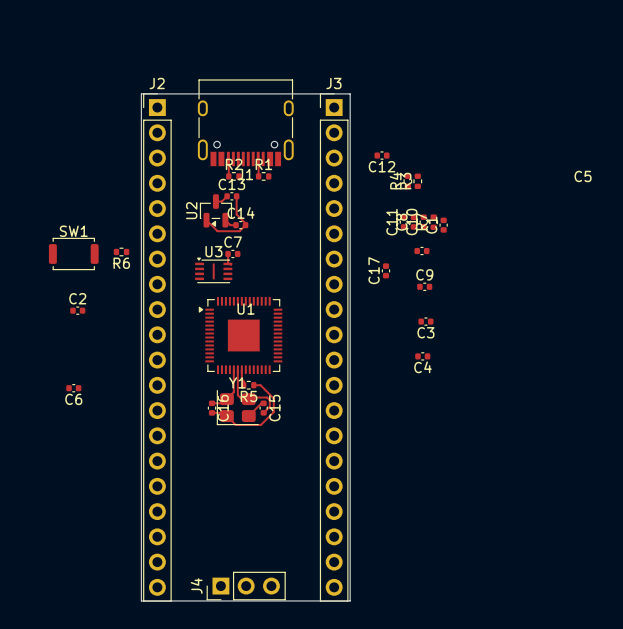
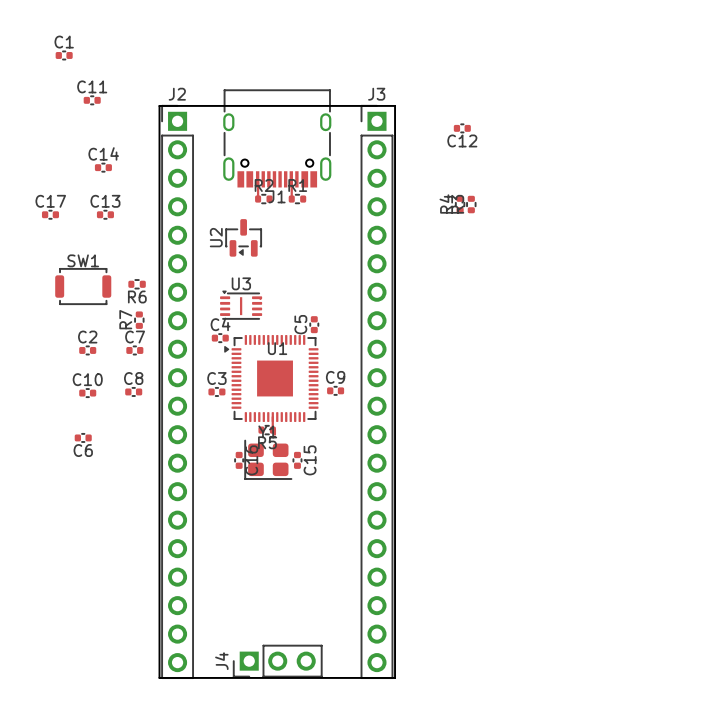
C12 position: (381, 155) -> (462, 128)
C5 name position: C5 (583, 176) -> C5 (300, 324)
track: (227, 196) (221, 201) (215, 201) -> none
C13 position: (231, 196) -> (105, 214)
track: (236, 196) (236, 214) (245, 223) (239, 231) (217, 231) (206, 220) -> none
track: (225, 220) (230, 225) (236, 225) -> none
C10 rotation: 0° (423, 221) -> 90° clockwise (87, 393)
C10 position: (423, 221) -> (87, 393)
C11 rotation: 0° (403, 222) -> 90° clockwise (92, 100)
C11 position: (403, 222) -> (92, 100)
C8 rotation: 0° (413, 222) -> 90° clockwise (133, 391)
C8 position: (413, 222) -> (133, 391)
R7 position: (433, 222) -> (139, 320)
C14 position: (240, 225) -> (103, 167)
C1 rotation: 0° (443, 225) -> 90° clockwise (64, 55)
C1 position: (443, 225) -> (64, 55)
C5 rotation: 0° (421, 251) -> 90° clockwise (314, 324)
C5 position: (421, 251) -> (314, 324)
track: (228, 253) (227, 263) -> none
C7 position: (232, 253) -> (134, 350)
C17 rotation: 0° (385, 270) -> 90° clockwise (50, 214)
C17 position: (385, 270) -> (50, 214)
C9 position: (424, 286) -> (335, 390)
C3 position: (425, 321) -> (216, 391)
C3 name position: C3 (425, 332) -> C3 (216, 378)
C4 position: (422, 356) -> (220, 338)
C4 name position: C4 (422, 367) -> C4 (220, 324)
track: (233, 369) (233, 392) (222, 403) (211, 403) -> none
track: (237, 369) (237, 395) (241, 399) (267, 397) (269, 400) (269, 406) (263, 412) -> none
R5 position: (248, 385) -> (267, 430)
track: (253, 385) (260, 385) (273, 398) (273, 412) (260, 425) (235, 425) (223, 412) (211, 412) -> none
track: (263, 403) (248, 416) -> none

